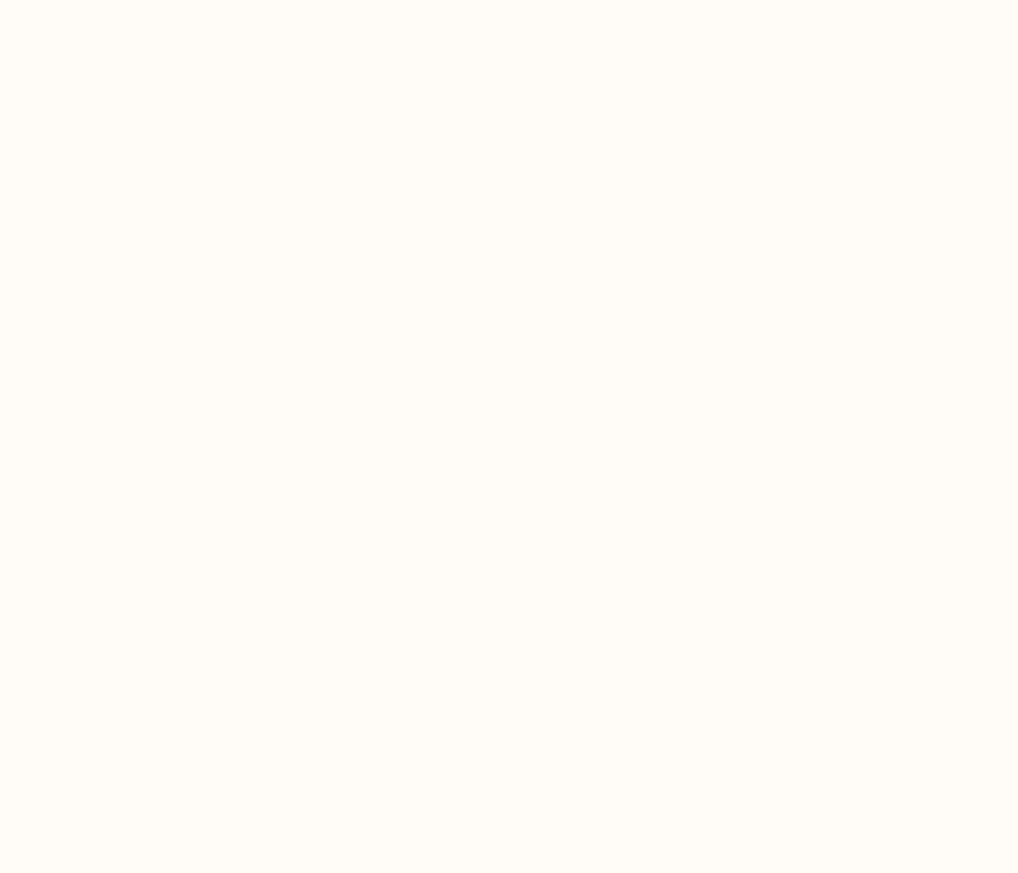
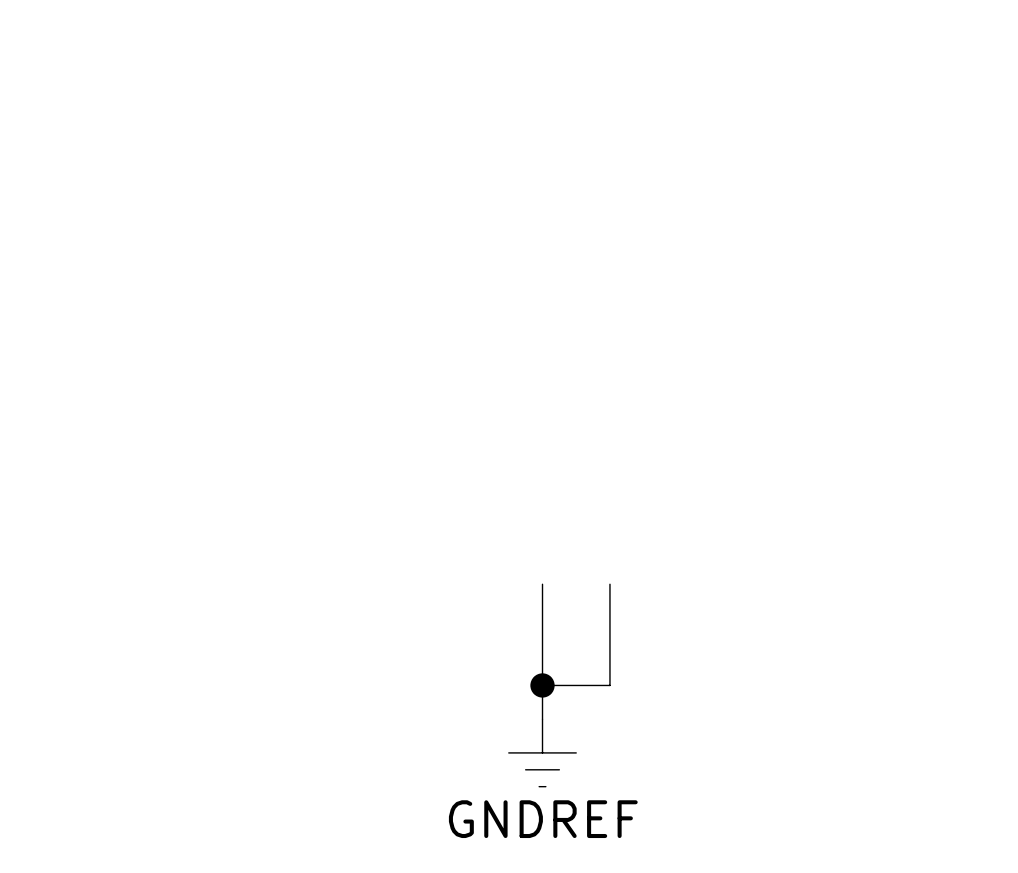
wire: none -> (542, 584) (542, 719)
wire: none -> (609, 584) (609, 685) (542, 685)
junction: none -> (542, 685)
power symbol: none -> GNDREF (542, 752)

